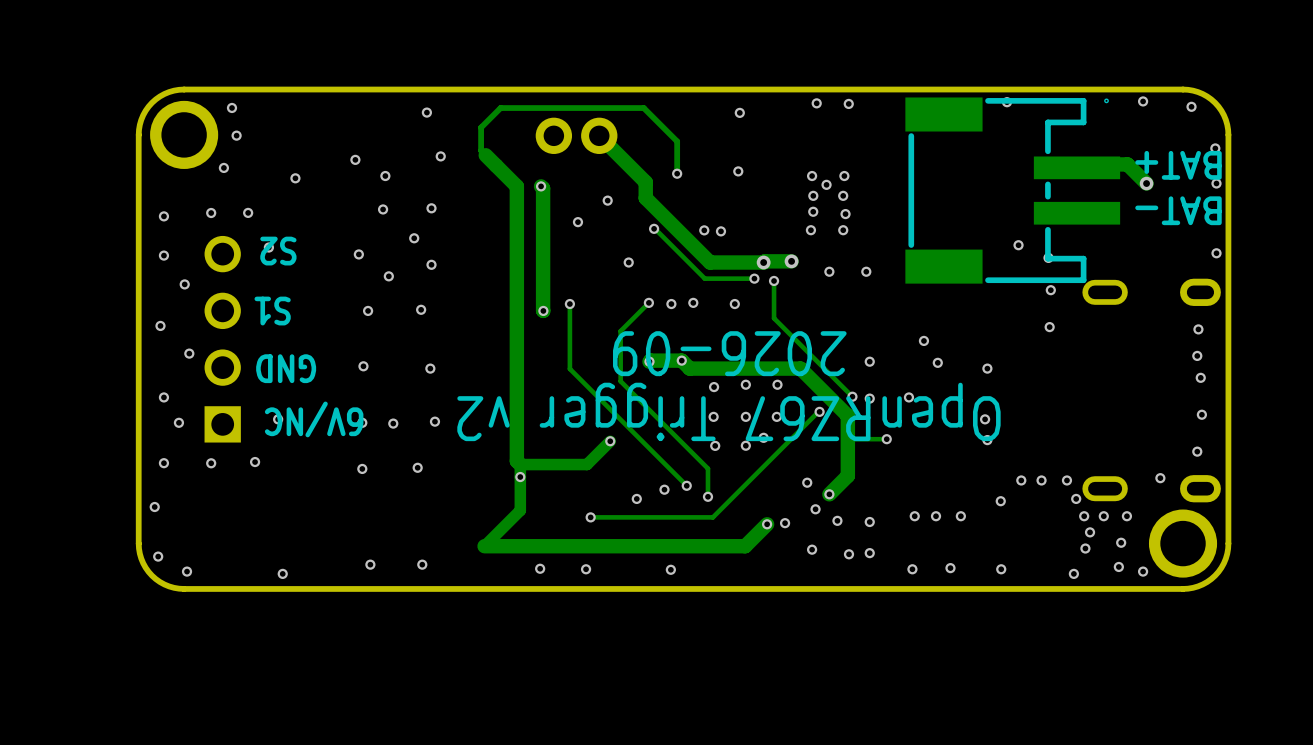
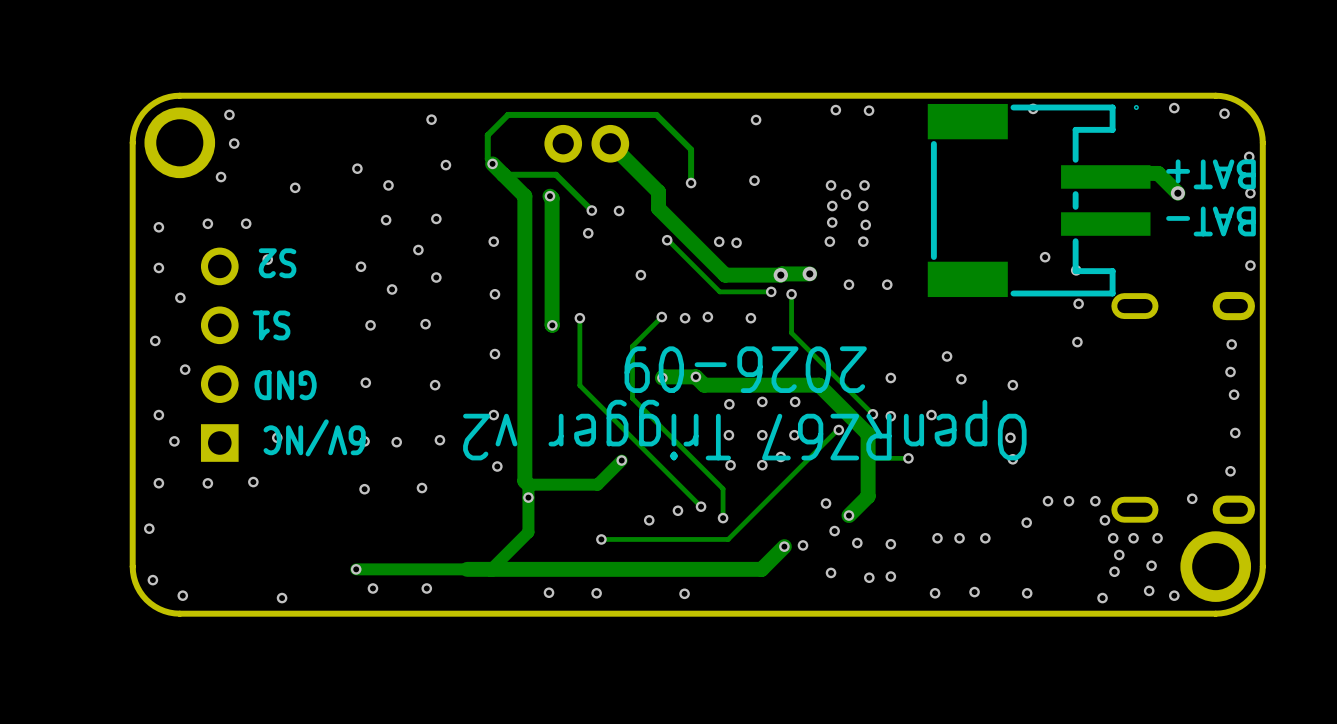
via: none -> (492, 163)
track: none -> (503, 174) (556, 174) (591, 210)
via: none -> (591, 210)
via: none -> (493, 241)
via: none -> (494, 294)
via: none -> (494, 354)
via: none -> (493, 415)
via: none -> (497, 466)
via: none -> (356, 569)
track: none -> (491, 569) (356, 569)

